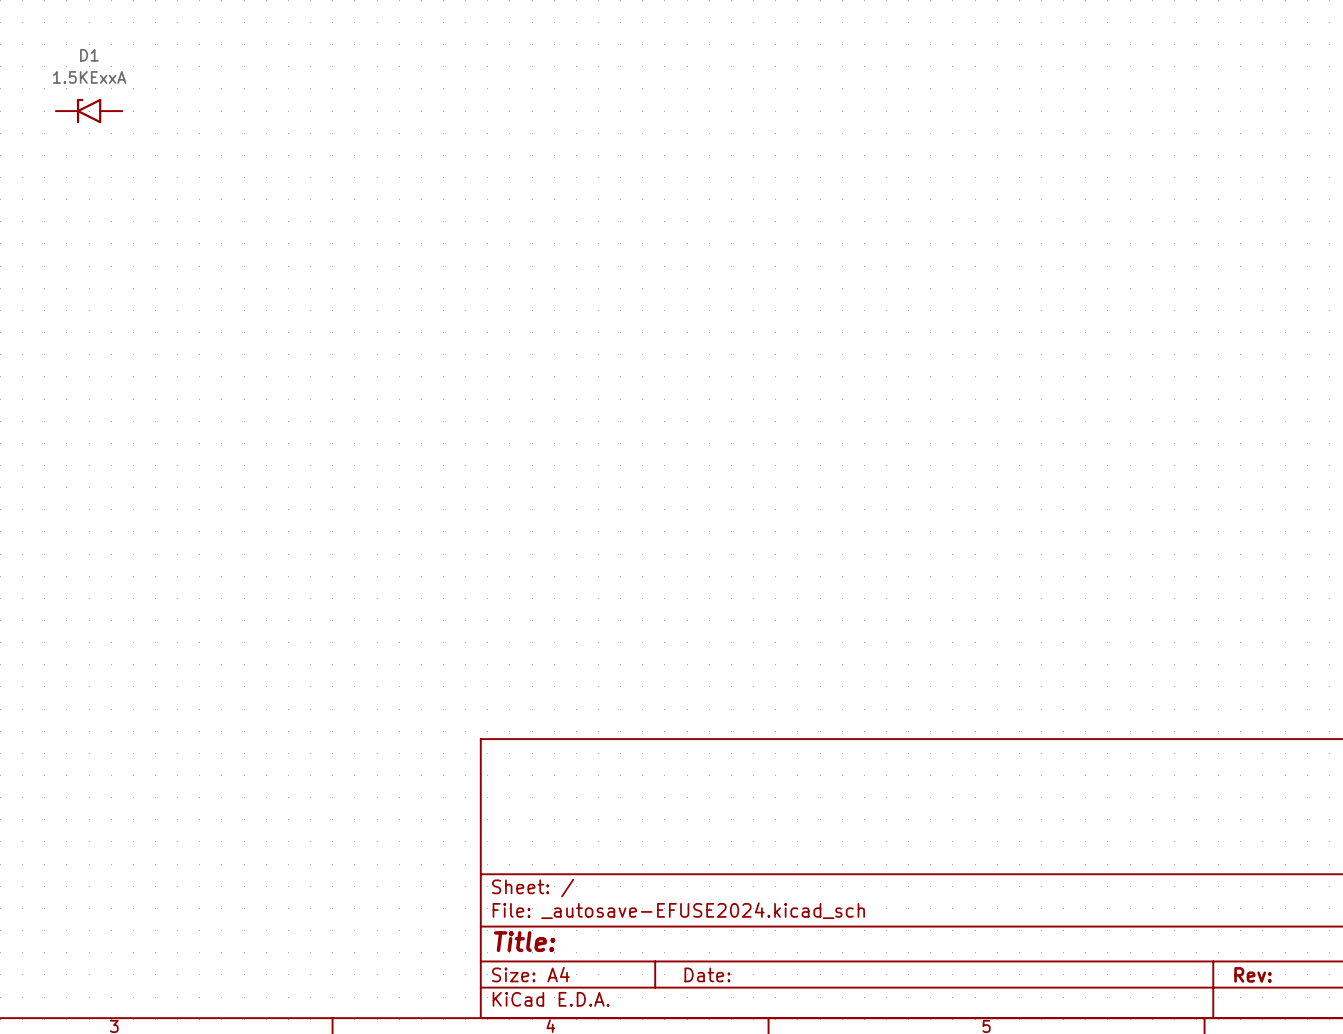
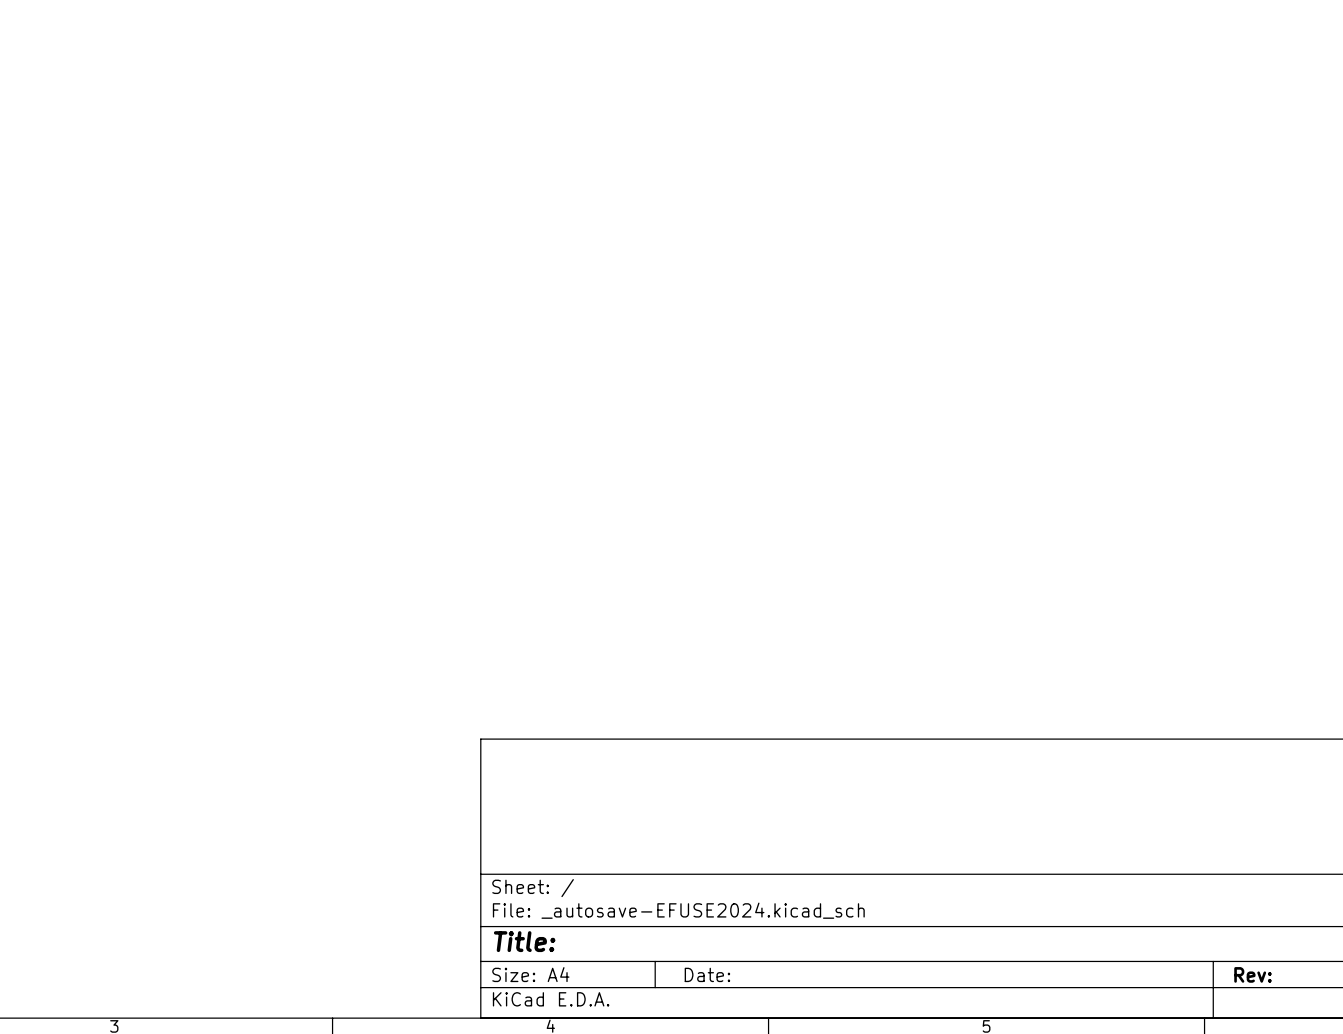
D1: 1.5KExxA (89, 111) -> none

